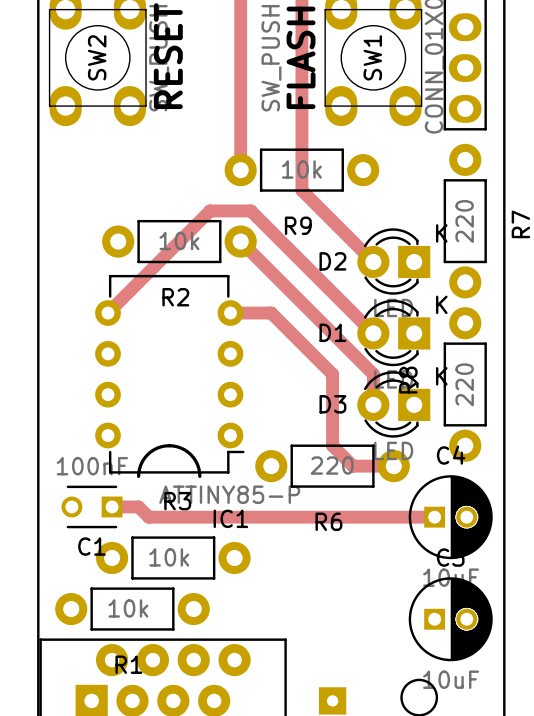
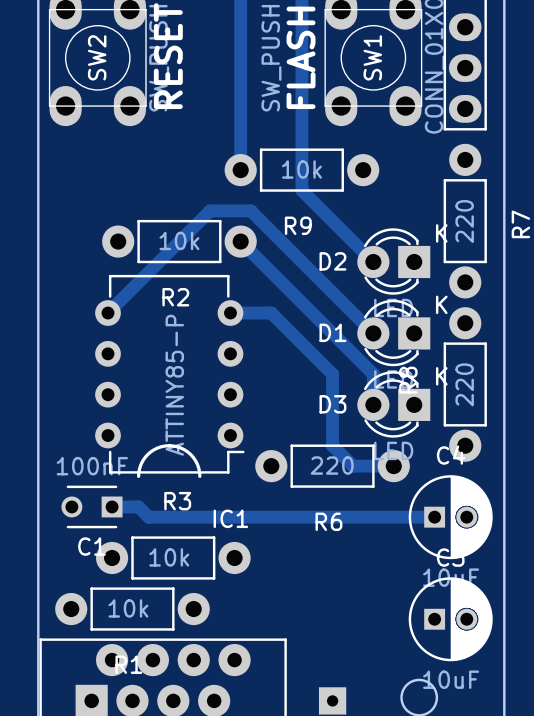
IC1 value rotation: 0° (229, 494) -> 90° counterclockwise (174, 385)

